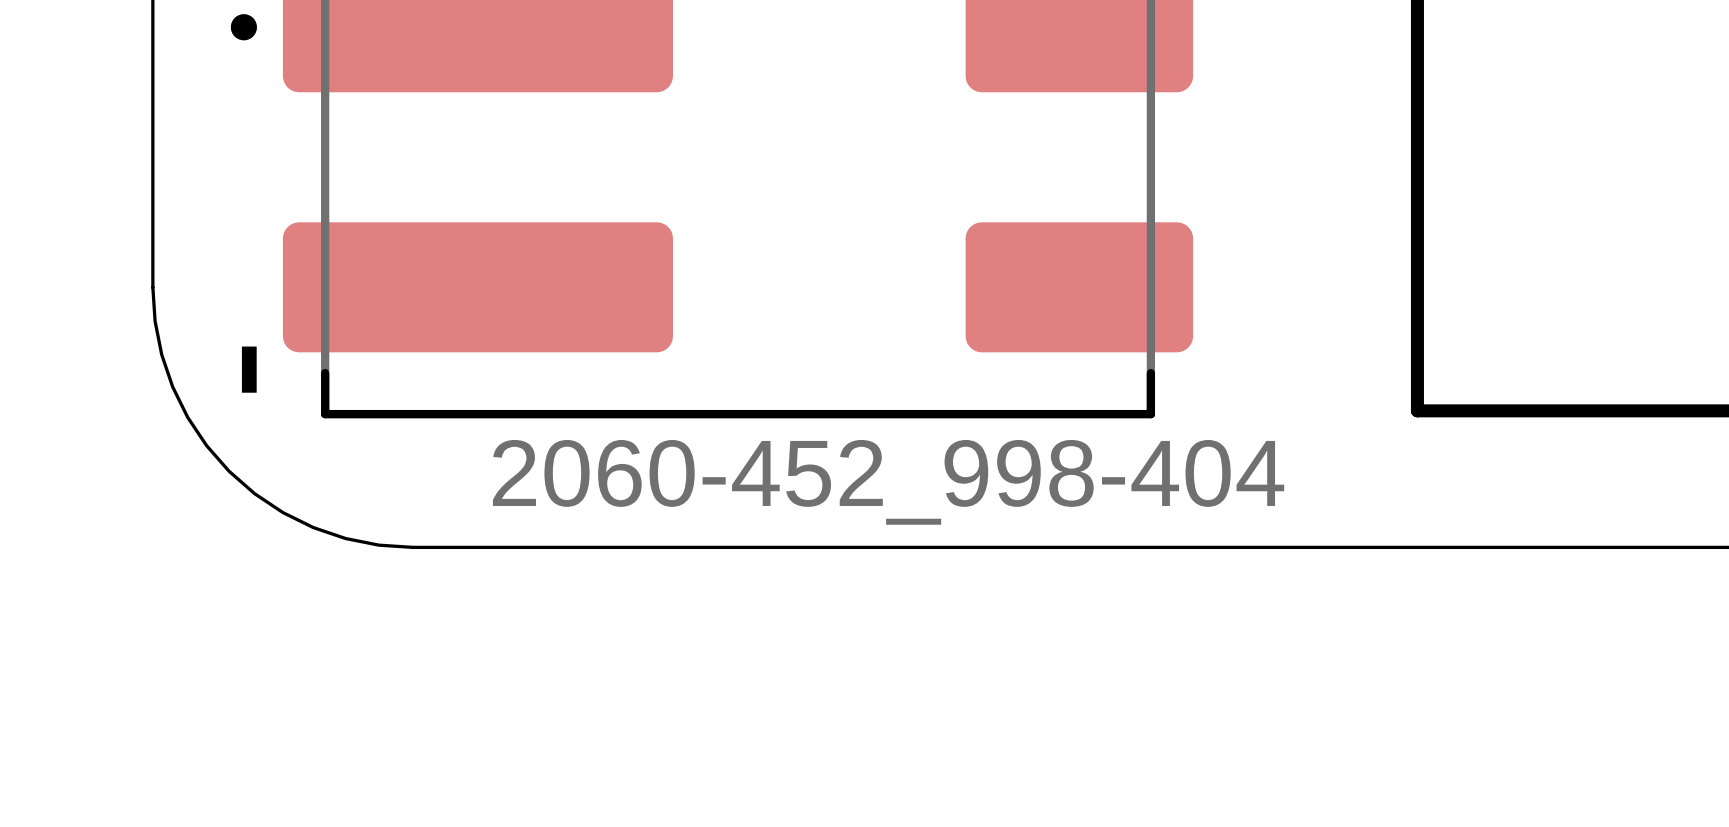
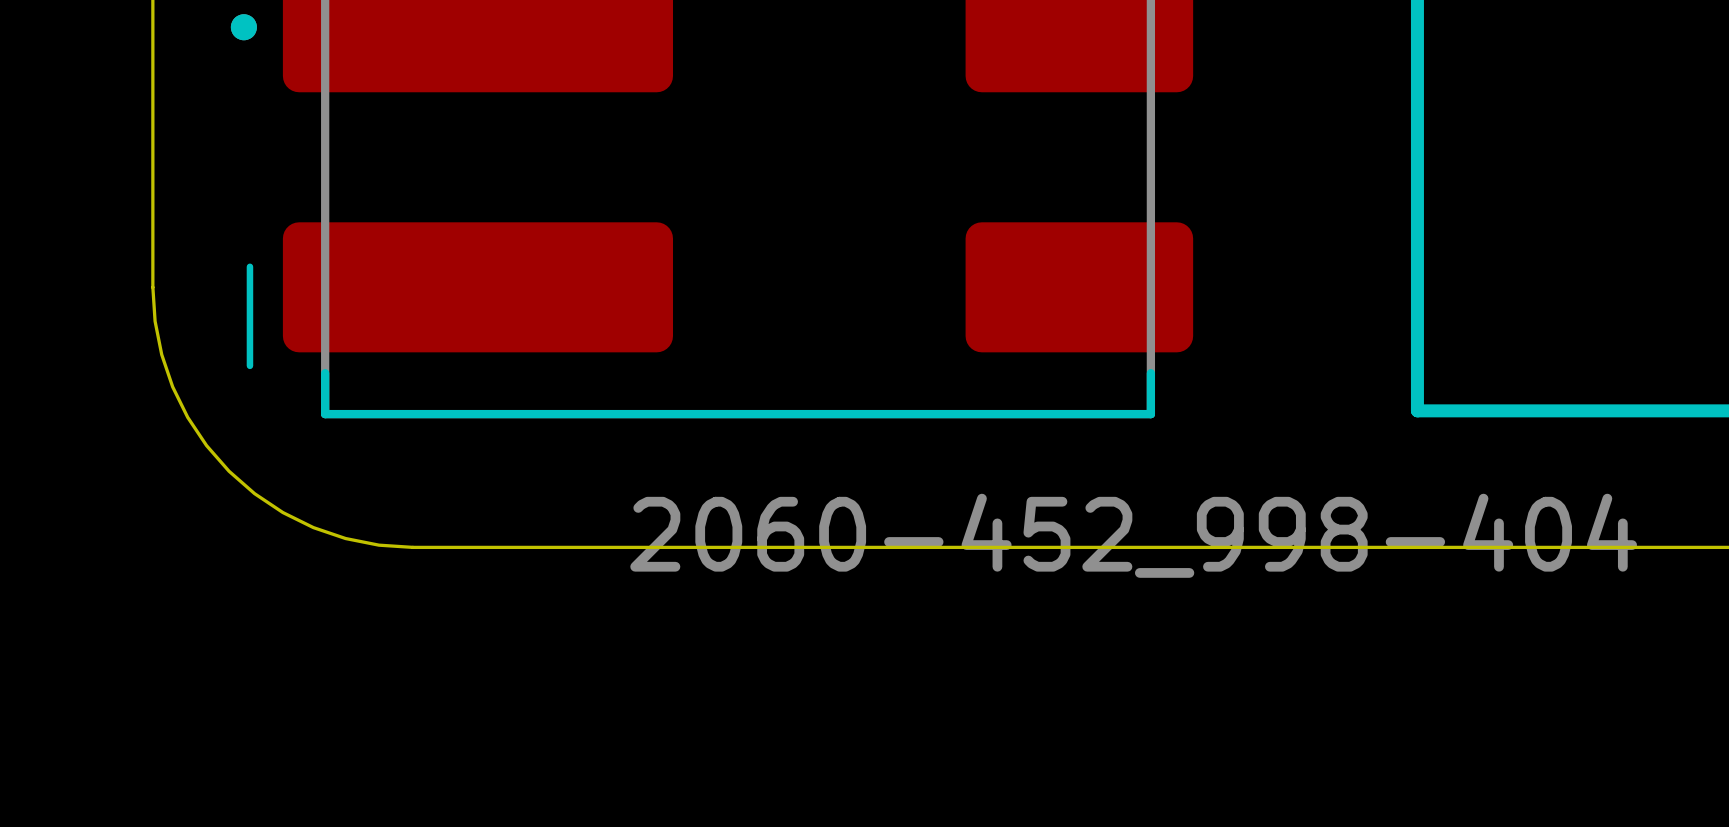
part value position: 2060-452_998-404 (888, 482) -> 2060-452_998-404 (1133, 535)

